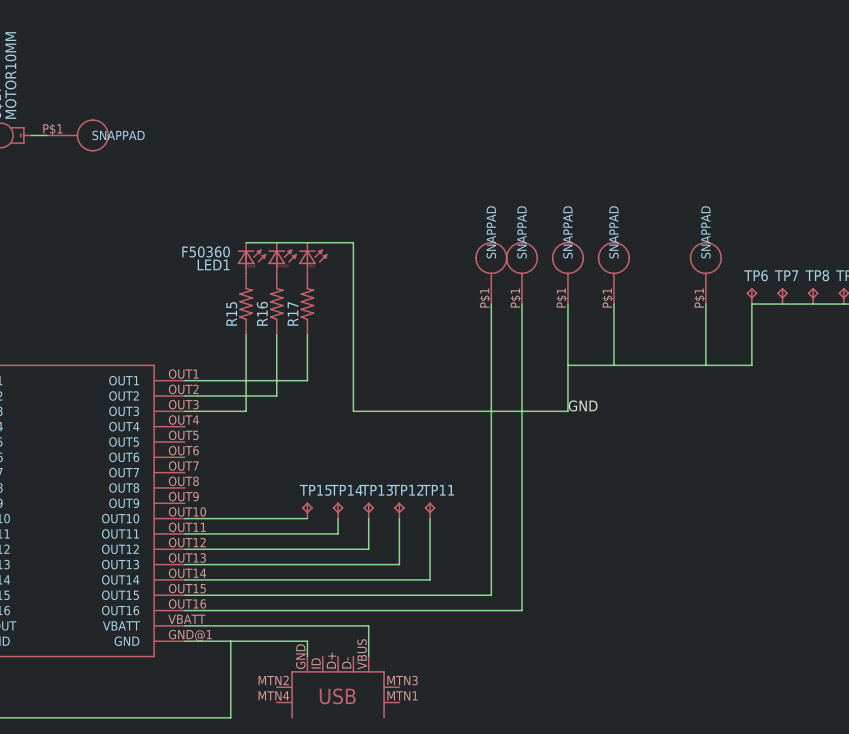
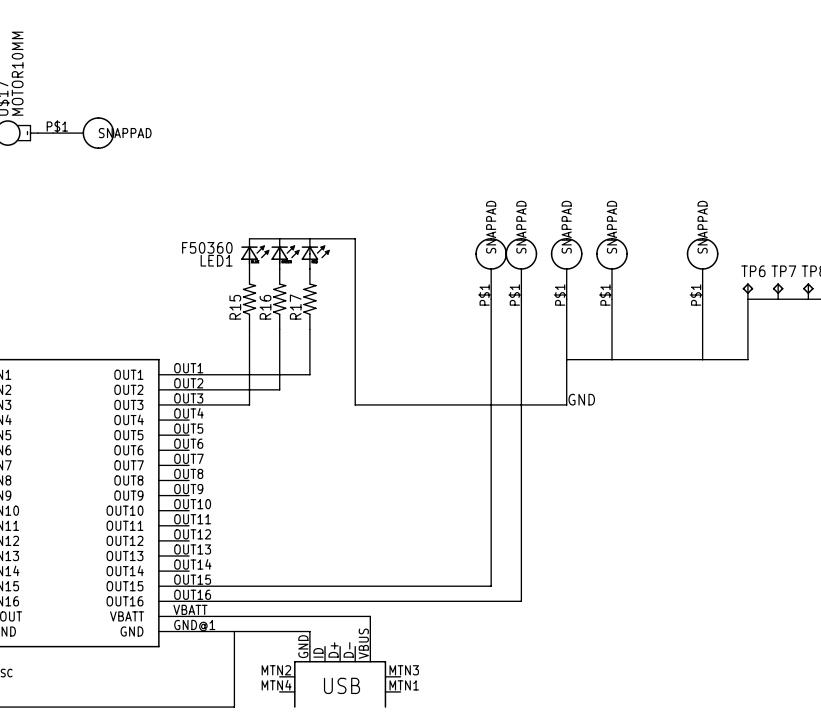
TP15: (307, 510) -> none
TP14: (338, 510) -> none
TP13: (368, 510) -> none
TP12: (399, 510) -> none
TP11: (430, 510) -> none
wire: (184, 518) (307, 518) -> none
wire: (338, 518) (338, 533) (184, 533) -> none
wire: (368, 518) (368, 549) (184, 549) -> none
wire: (399, 518) (399, 564) (184, 564) -> none
wire: (430, 518) (430, 579) (184, 579) -> none

